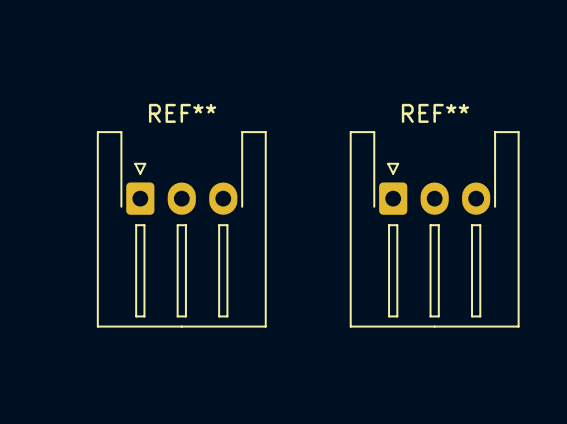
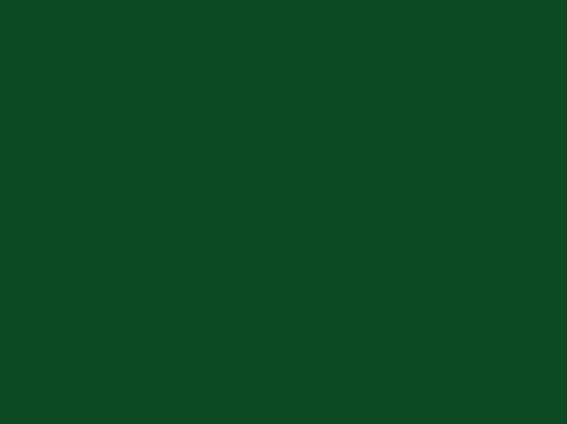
REF**: (181, 229) -> none
REF**: (434, 229) -> none

